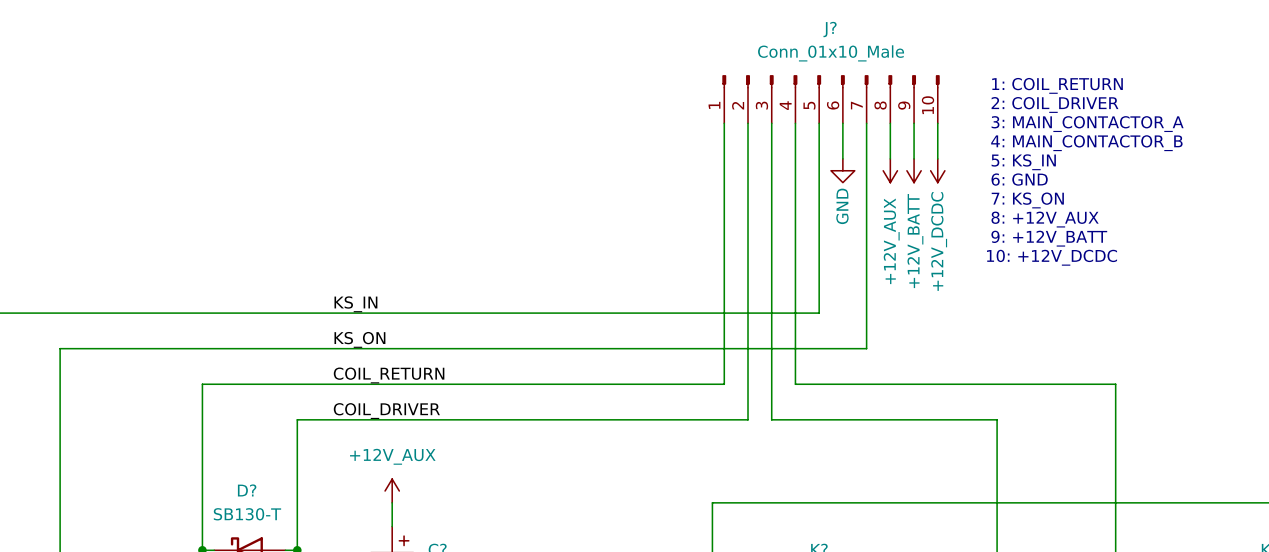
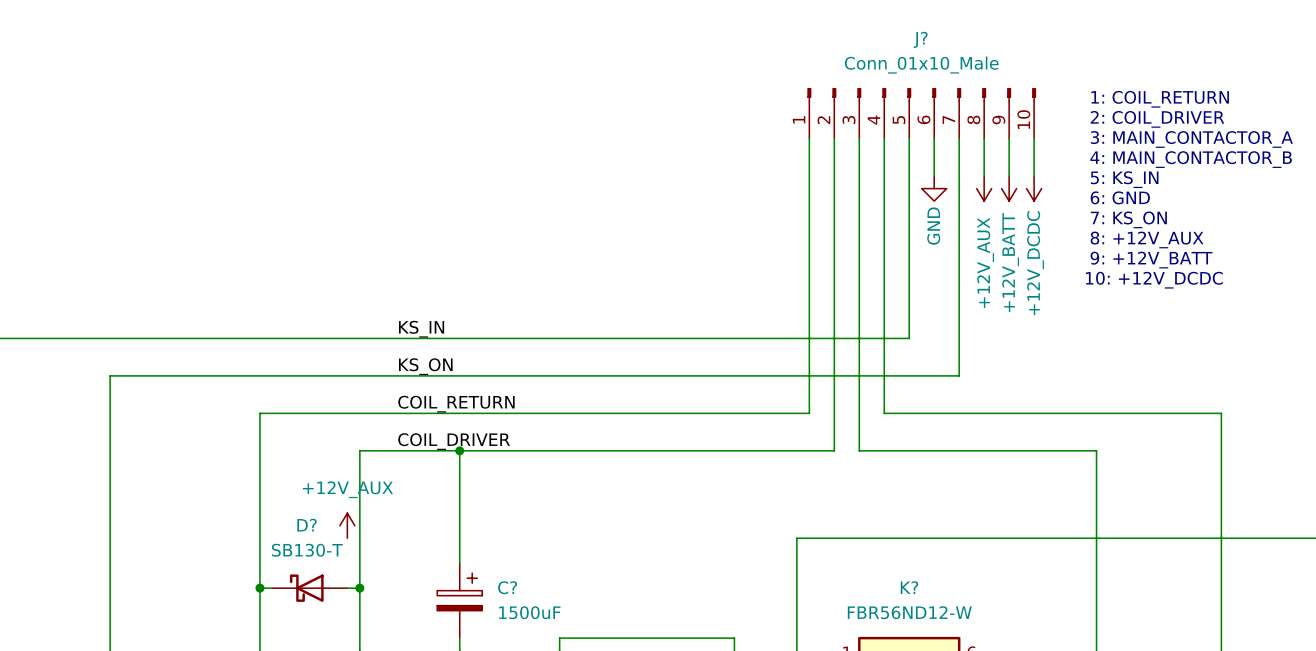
wire: none -> (459, 450) (459, 538)
junction: none -> (459, 450)
power symbol position: +12V_AUX (392, 490) -> +12V_AUX (347, 525)

